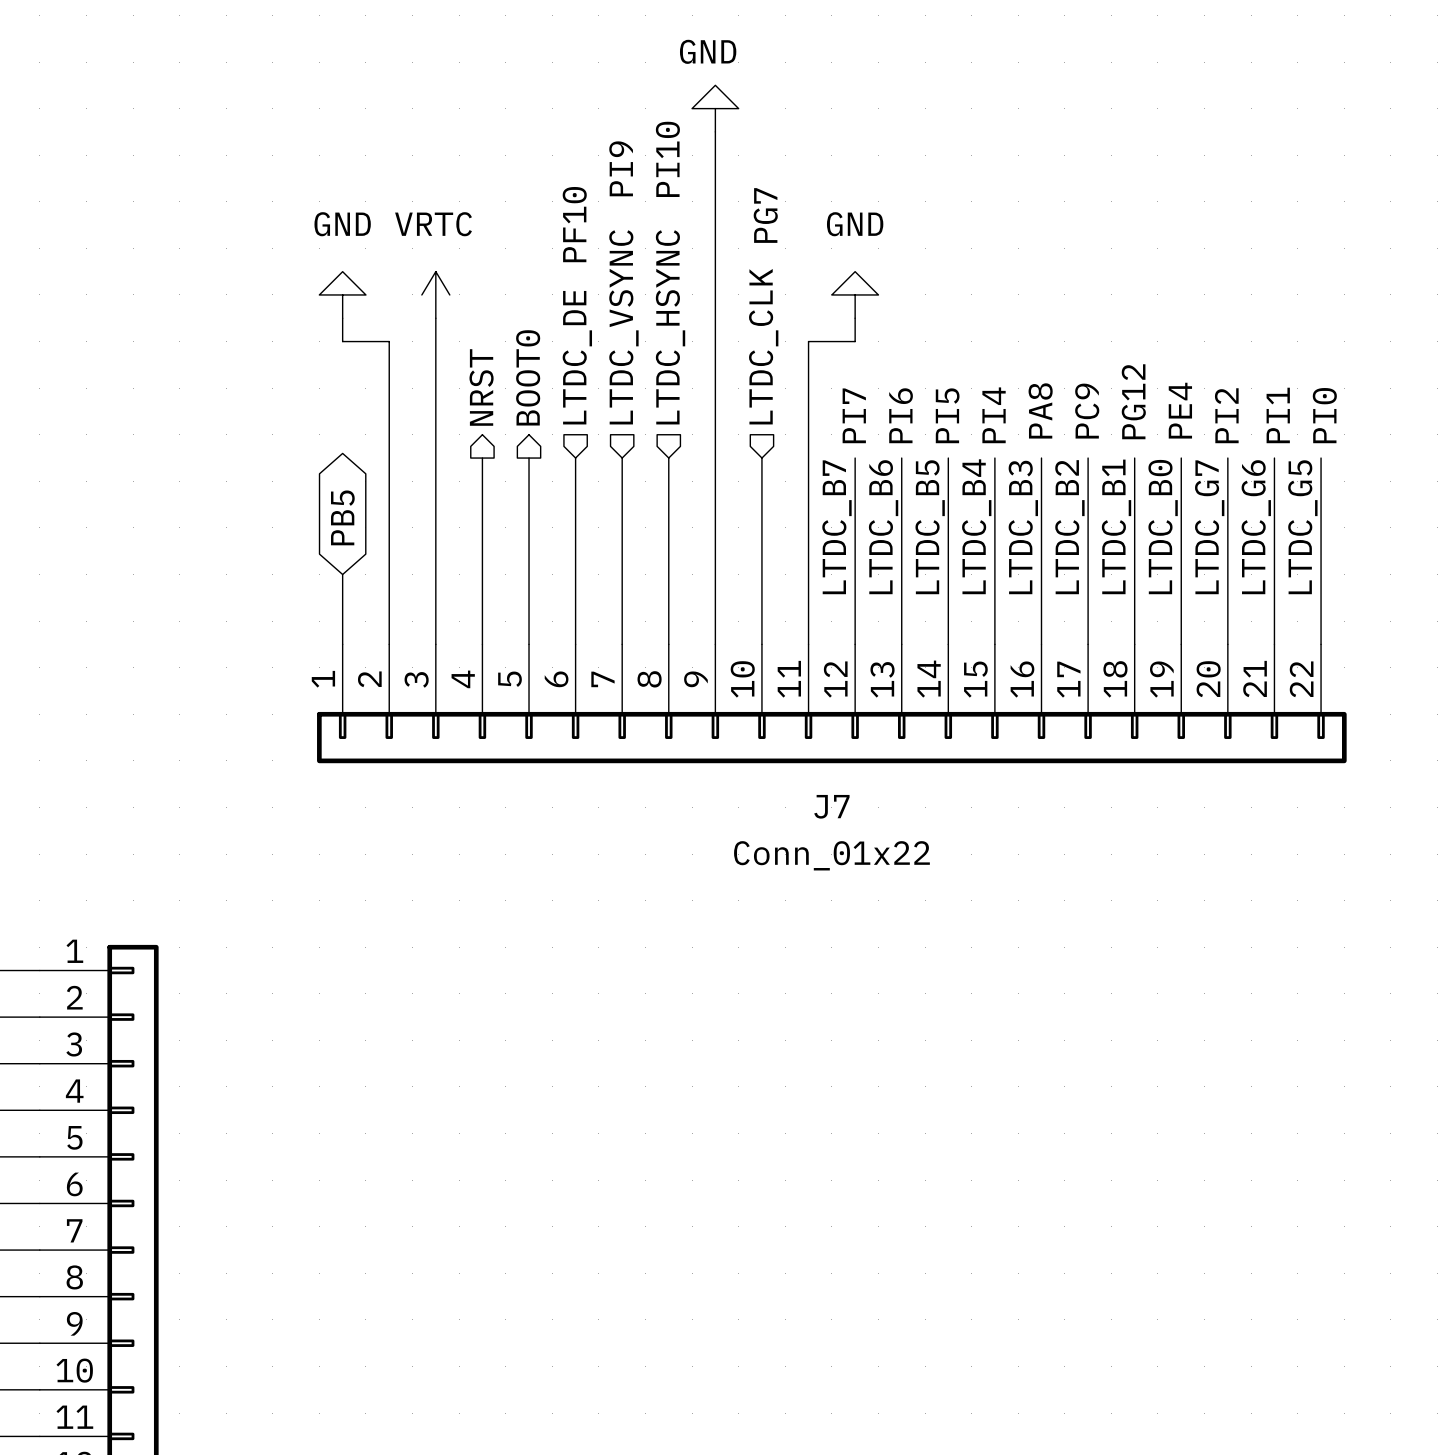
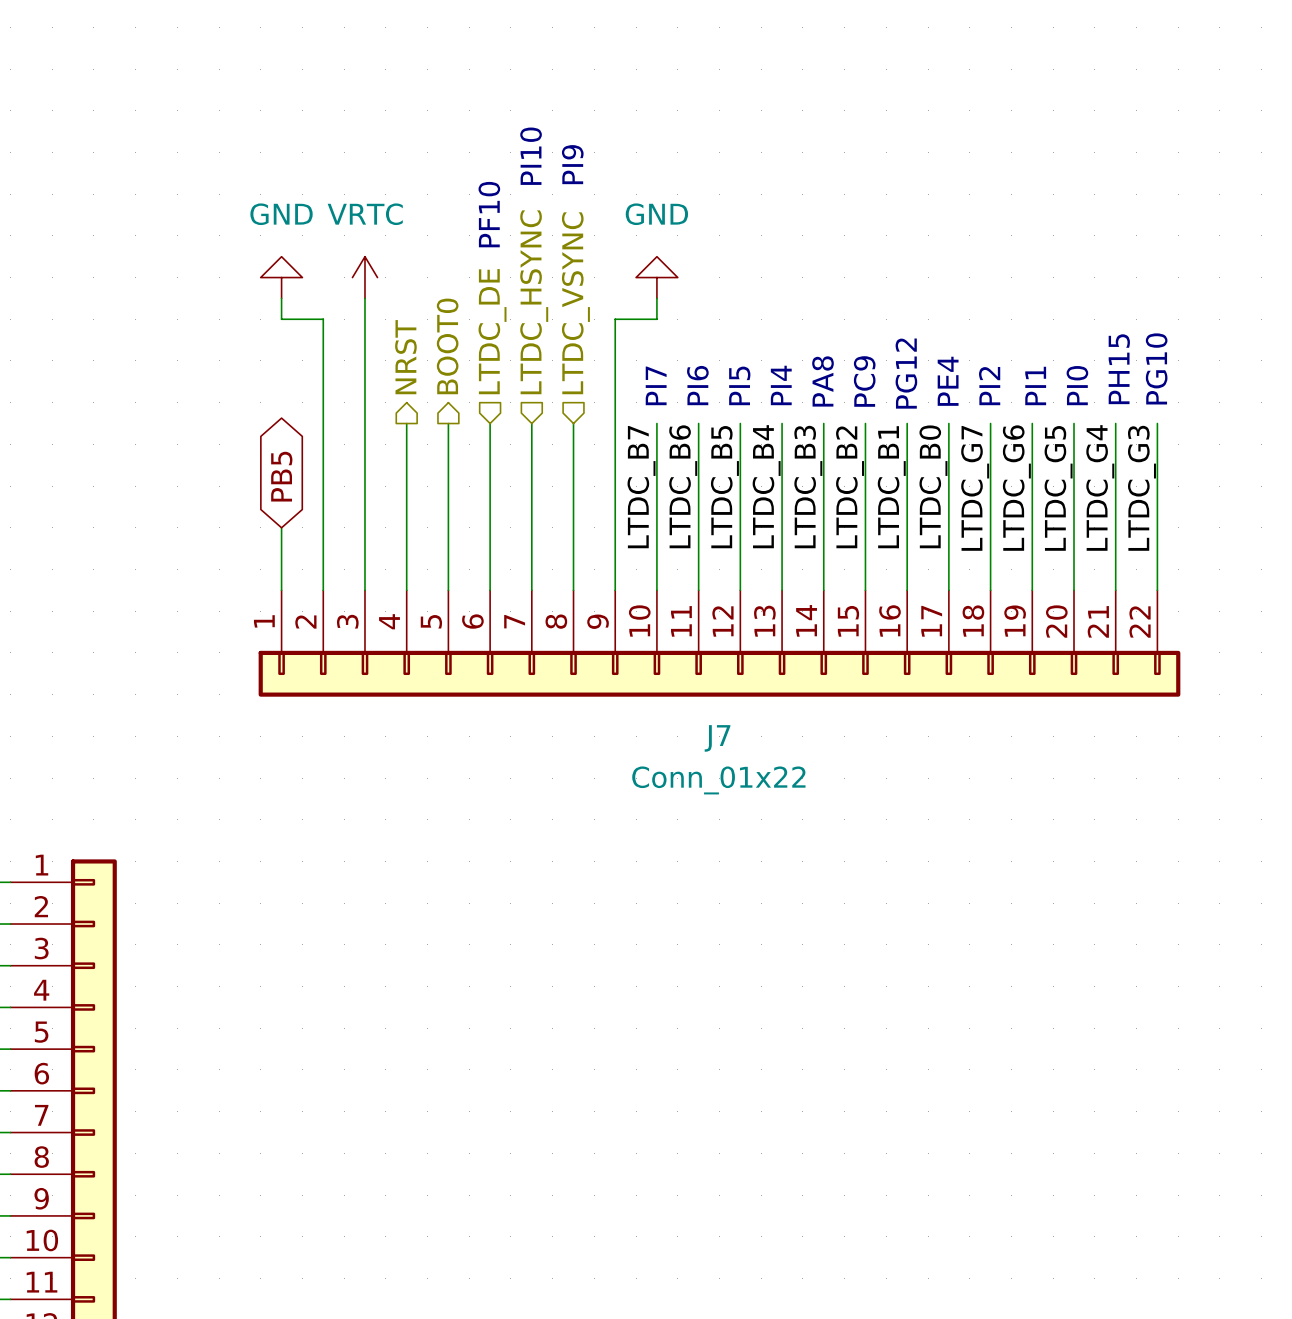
power symbol: GND (715, 108) -> none
wire: (715, 131) (715, 341) -> (656, 298) (656, 319) (615, 319)
text position: PI10 (667, 159) -> PI10 (531, 156)
text position: PI9 (621, 168) -> PI9 (572, 164)
text: PG7 (765, 215) -> none
power symbol position: GND (855, 294) -> GND (656, 277)
wire: (855, 318) (855, 341) (808, 341) (808, 458) -> none
hierarchical label: LTDC_VSYNC (623, 327) -> LTDC_HSYNC (534, 302)
hierarchical label: LTDC_HSYNC (670, 327) -> LTDC_VSYNC (575, 303)
hierarchical label: LTDC_CLK (763, 346) -> none
text: none -> PG10 (1156, 368)
text: none -> PH15 (1119, 369)
text position: PG12 (1133, 401) -> PG12 (906, 373)
text position: PA8 (1040, 410) -> PA8 (822, 381)
text: PE4 (1180, 410) -> none
text: PC9 (1087, 411) -> PE4 (948, 381)
text: none -> PI7 (656, 385)
text: none -> PI6 (697, 385)
text: PI7 (854, 415) -> PI5 (739, 385)
text: PI6 (901, 415) -> PI4 (781, 385)
text: PI5 (947, 415) -> none
text: PI4 (994, 415) -> PC9 (864, 381)
text position: PI2 (1226, 415) -> PI2 (989, 386)
text position: PI1 (1278, 415) -> PI1 (1035, 385)
text position: PI0 (1324, 415) -> PI0 (1077, 385)
label: LTDC_B4 (976, 526) -> LTDC_B2 (850, 487)
label: LTDC_B1 (1116, 526) -> LTDC_G7 (975, 488)
label: none -> LTDC_B7 (641, 487)
label: none -> LTDC_B6 (683, 486)
label: LTDC_B7 (836, 527) -> LTDC_B5 (724, 487)
label: LTDC_B6 (883, 527) -> LTDC_B4 (766, 486)
label: LTDC_B5 (930, 527) -> LTDC_B3 (808, 487)
label: LTDC_B3 (1023, 527) -> LTDC_B1 (891, 487)
label: LTDC_B2 (1069, 527) -> LTDC_B0 (933, 486)
label: LTDC_B0 (1163, 527) -> LTDC_G6 (1016, 488)
label: LTDC_G7 (1209, 527) -> LTDC_G5 (1058, 488)
label: LTDC_G6 (1256, 527) -> LTDC_G4 (1100, 487)
label: LTDC_G5 (1302, 527) -> LTDC_G3 (1141, 488)

